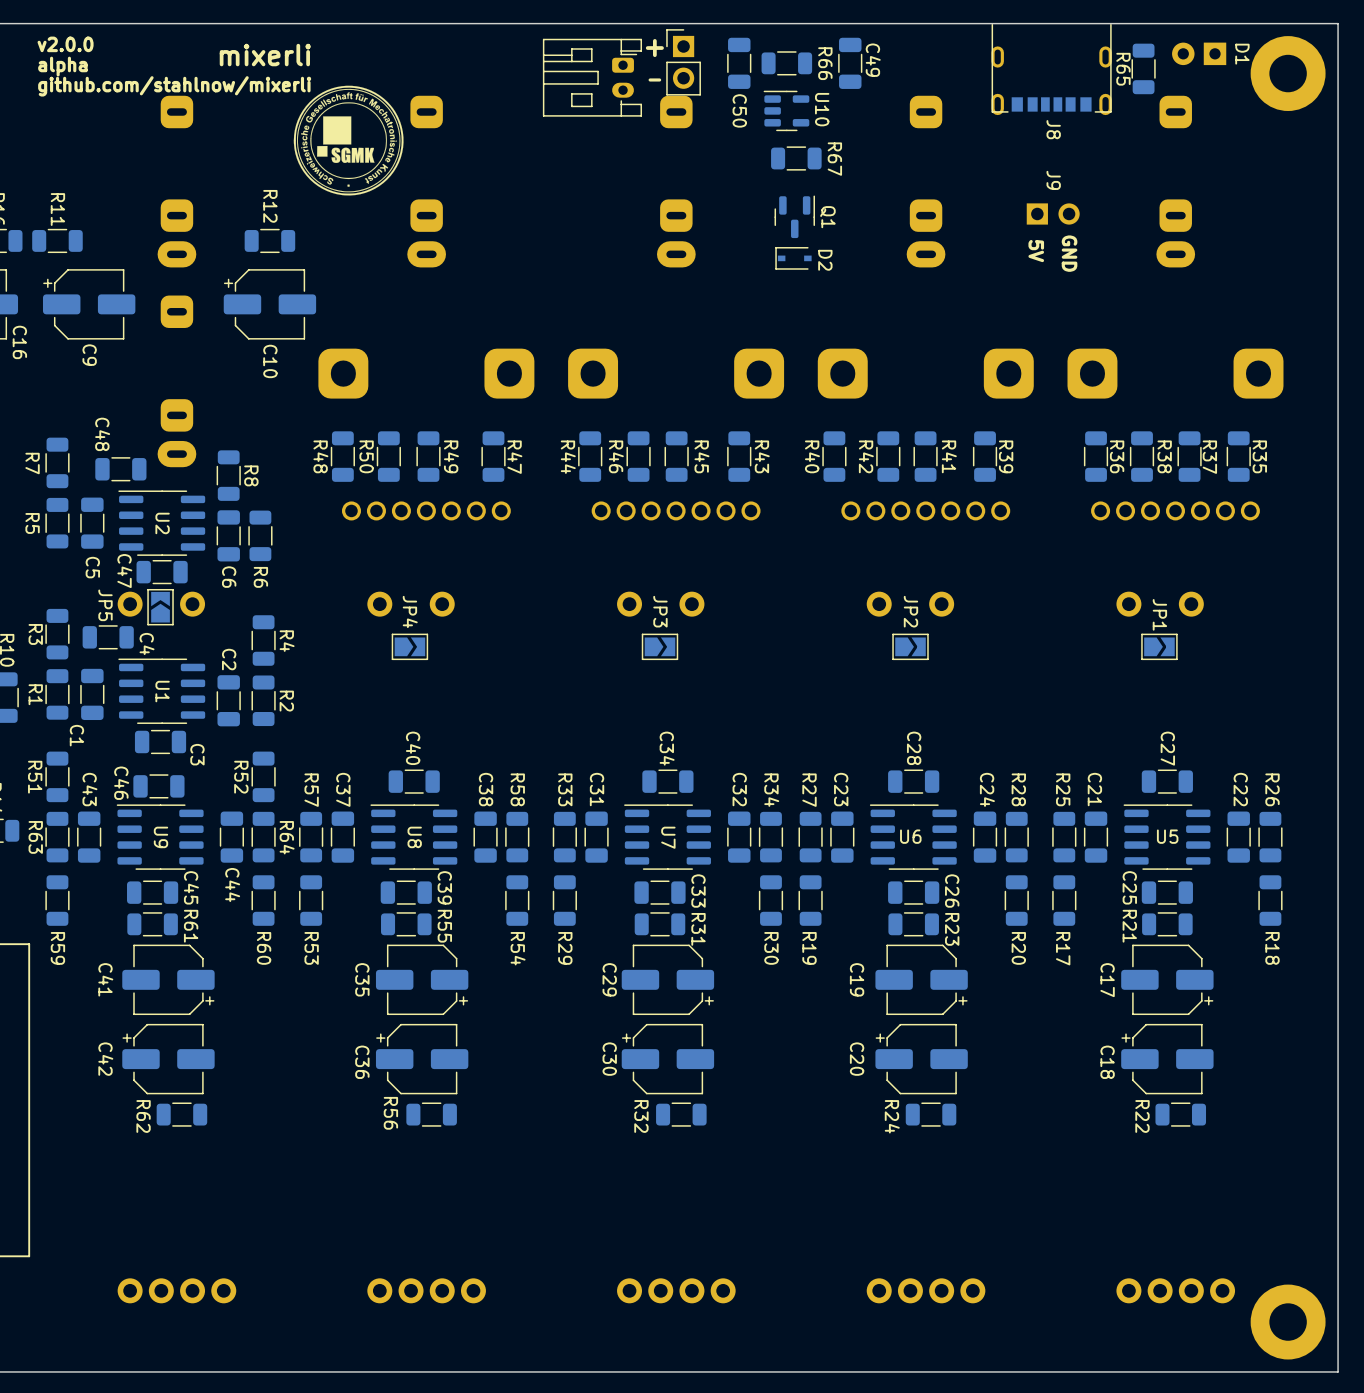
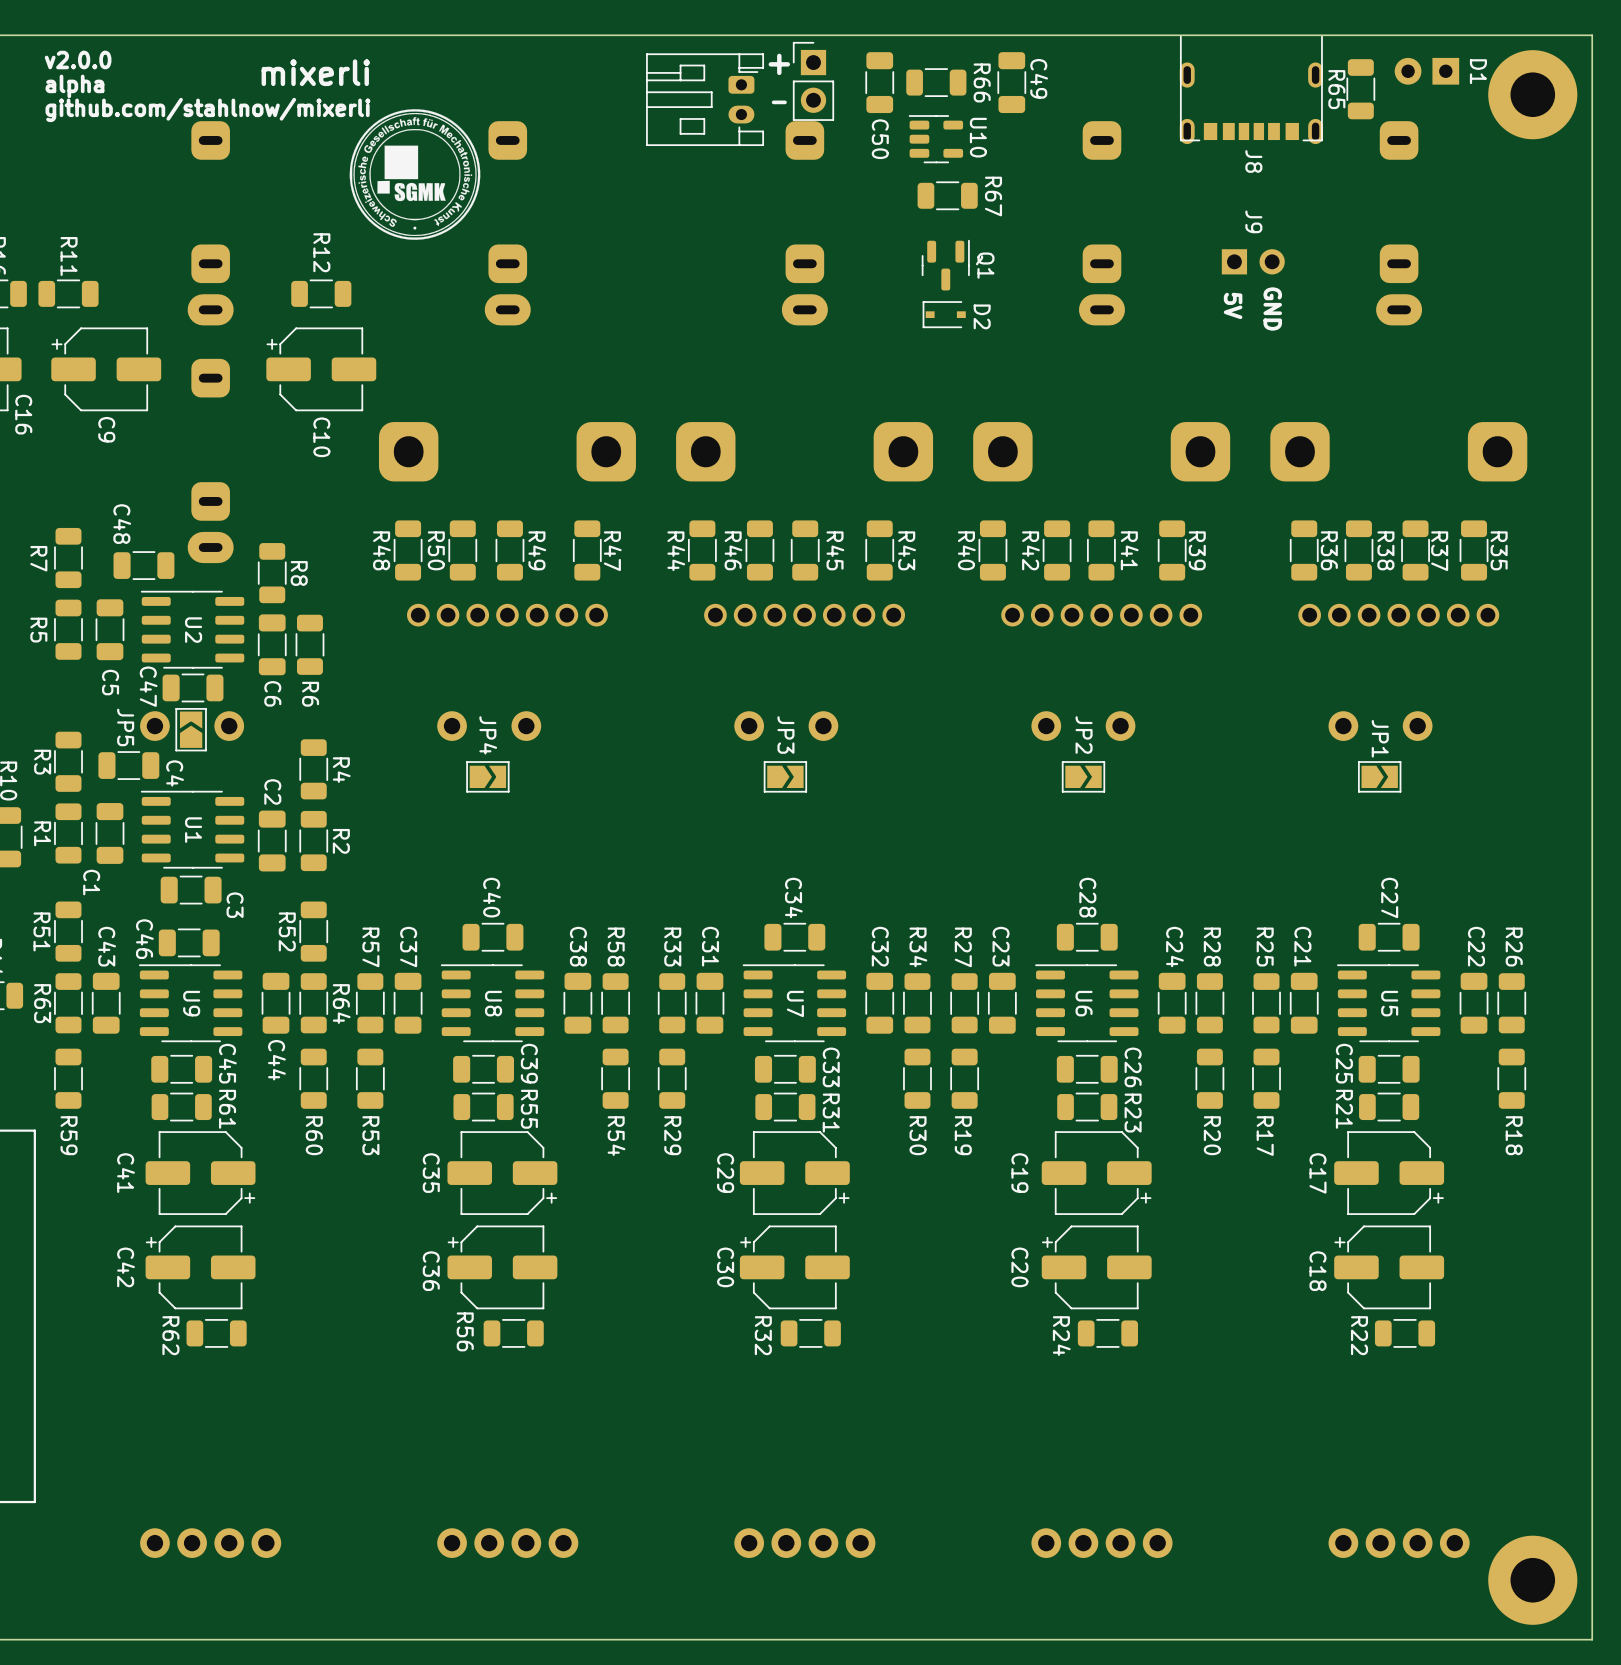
U6 name rotation: 0° (910, 836) -> 90° clockwise (1084, 1003)
U5 name rotation: 0° (1167, 836) -> 90° clockwise (1389, 1003)

